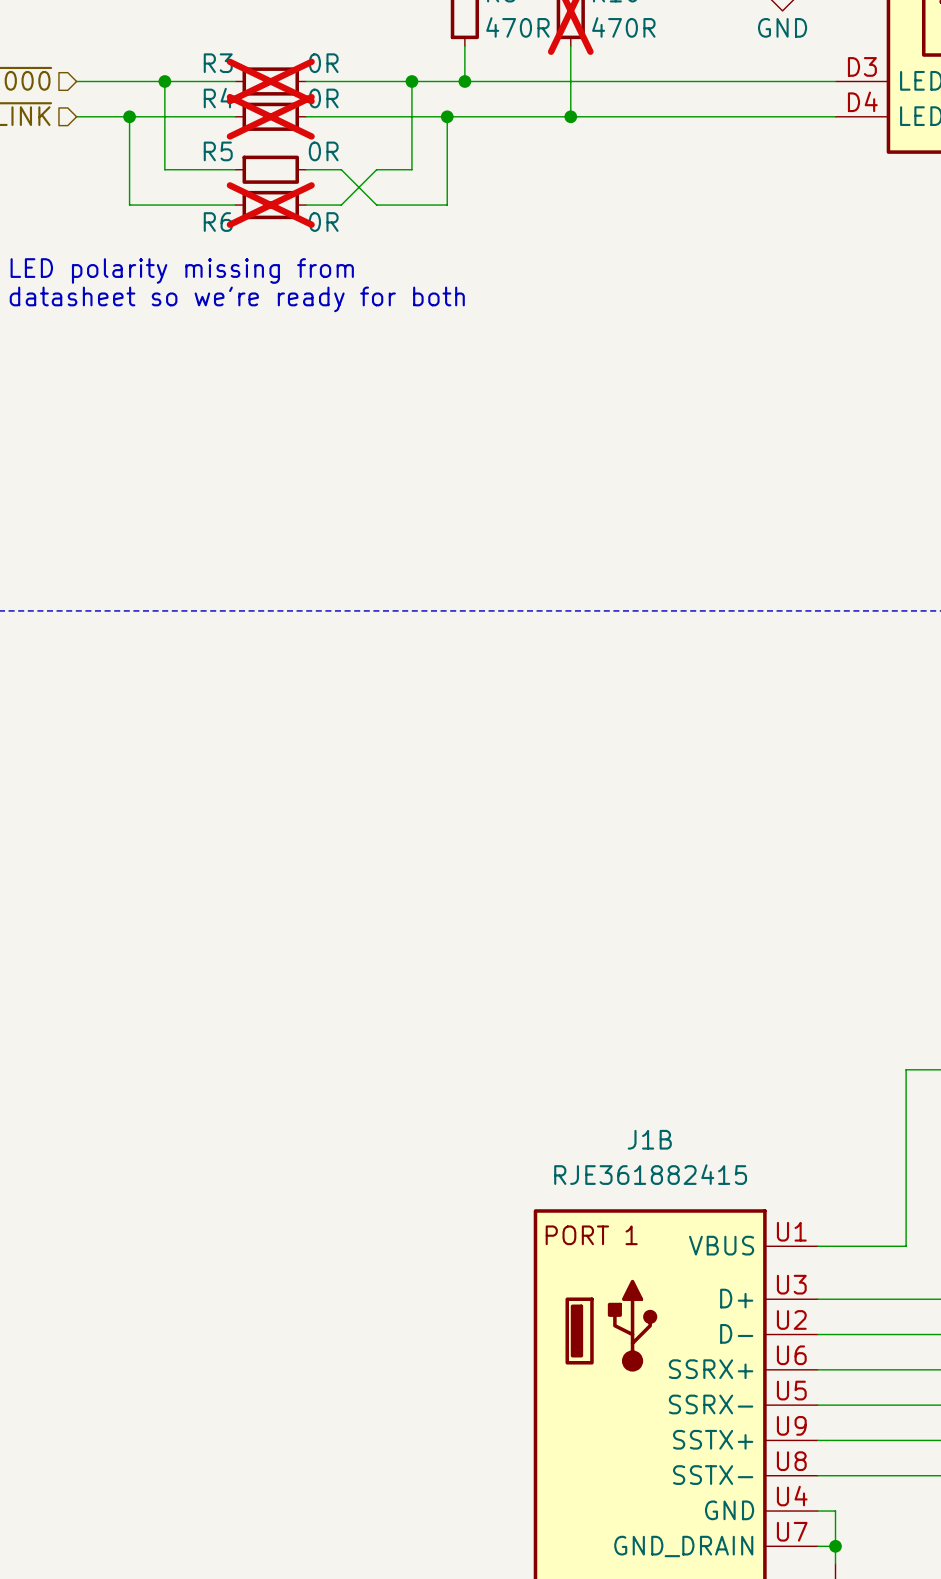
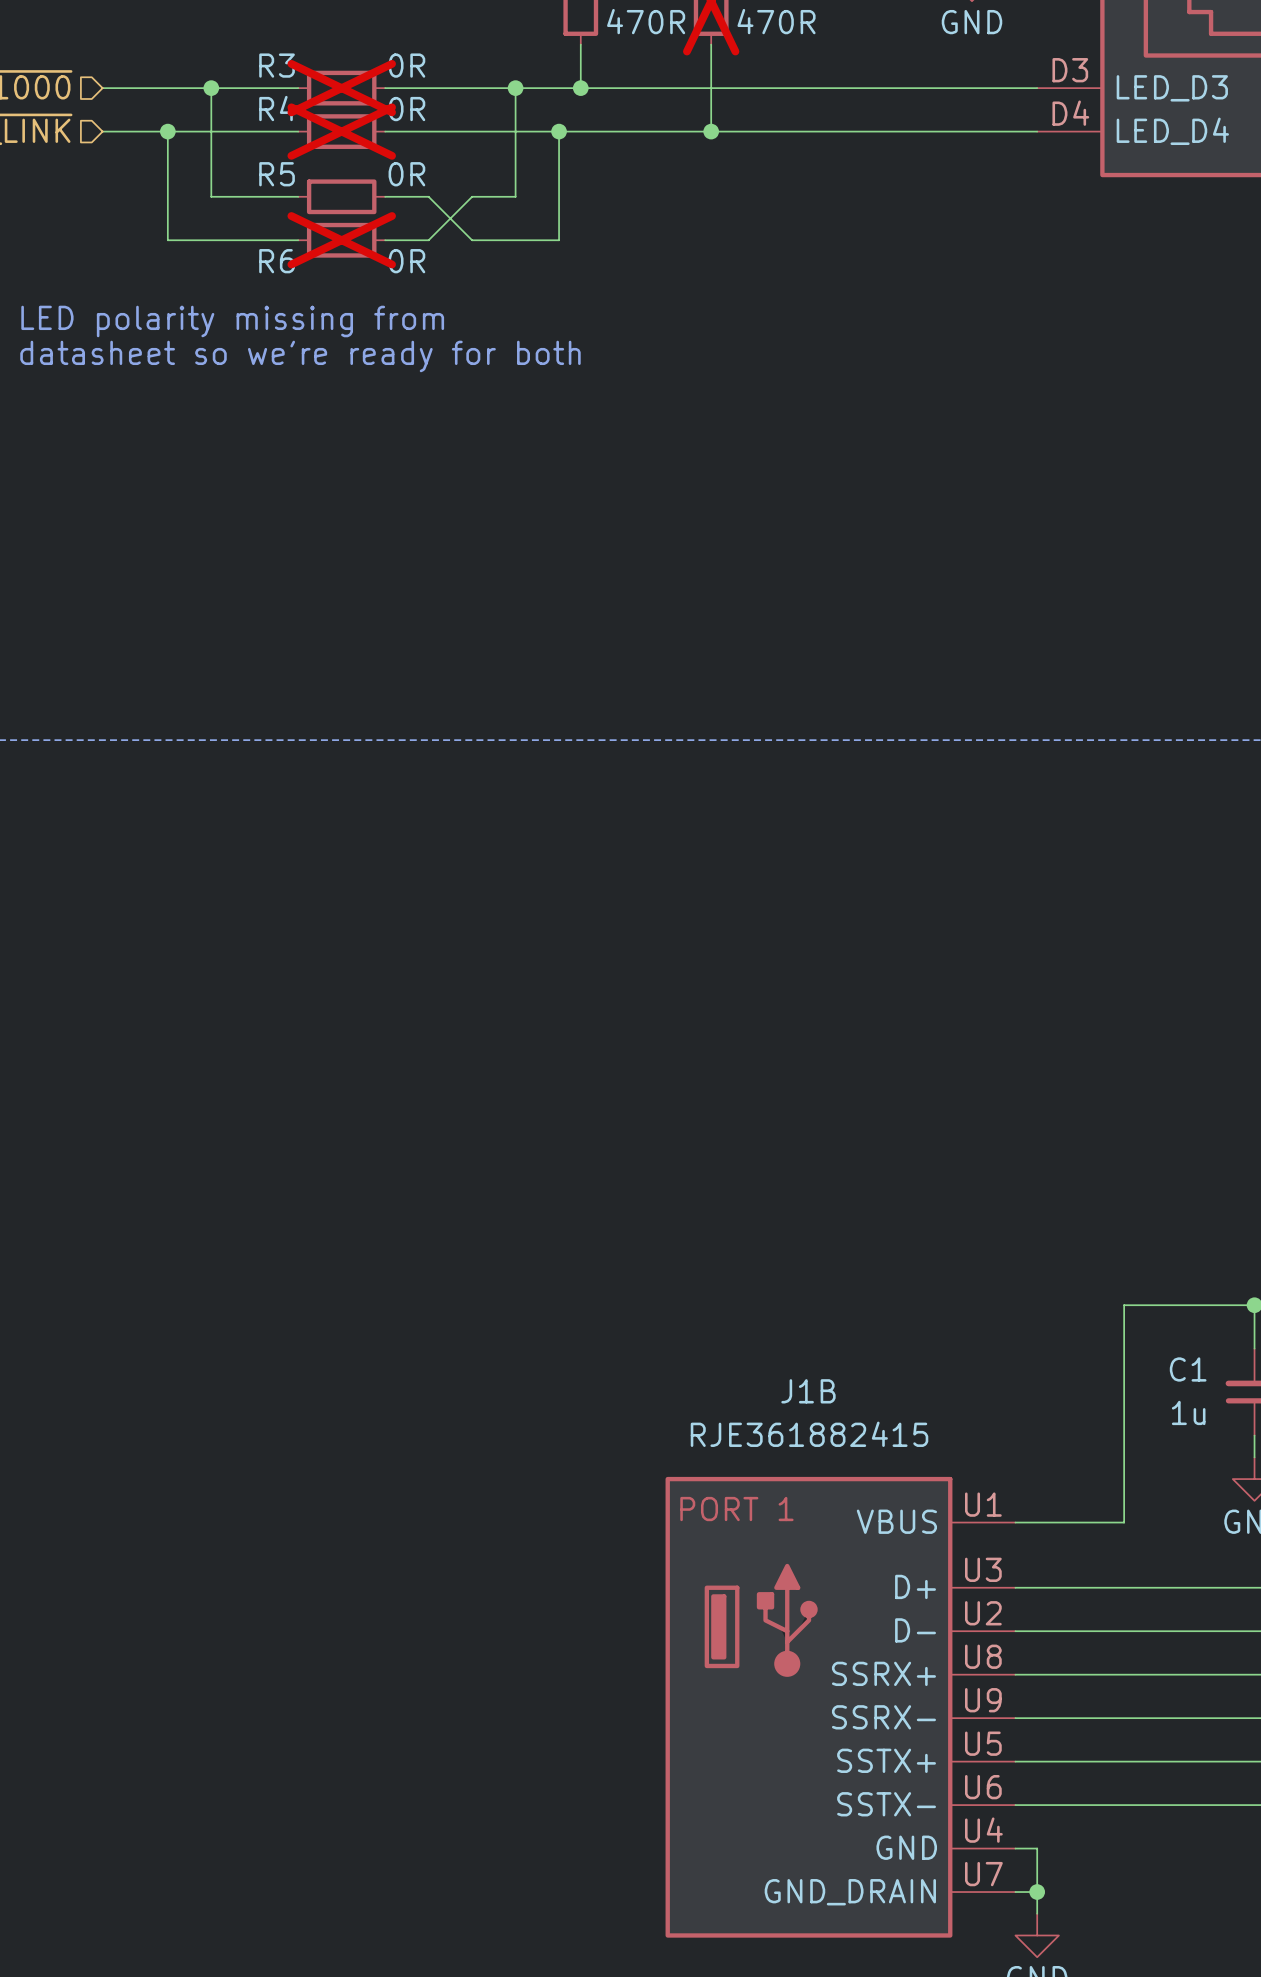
J1B pin number: U6 (791, 1355) -> U8 (983, 1656)
J1B pin number: U5 (791, 1390) -> U9 (983, 1700)
J1B pin number: U9 (791, 1425) -> U5 (983, 1743)
J1B pin number: U8 (791, 1461) -> U6 (983, 1787)

